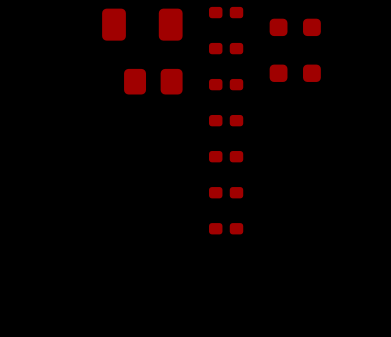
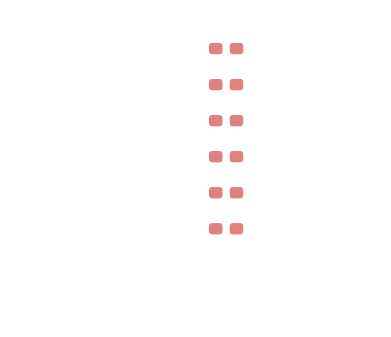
part: (226, 12) -> none
part: (142, 24) -> none
part: (295, 27) -> none
part: (295, 73) -> none
part: (153, 81) -> none

